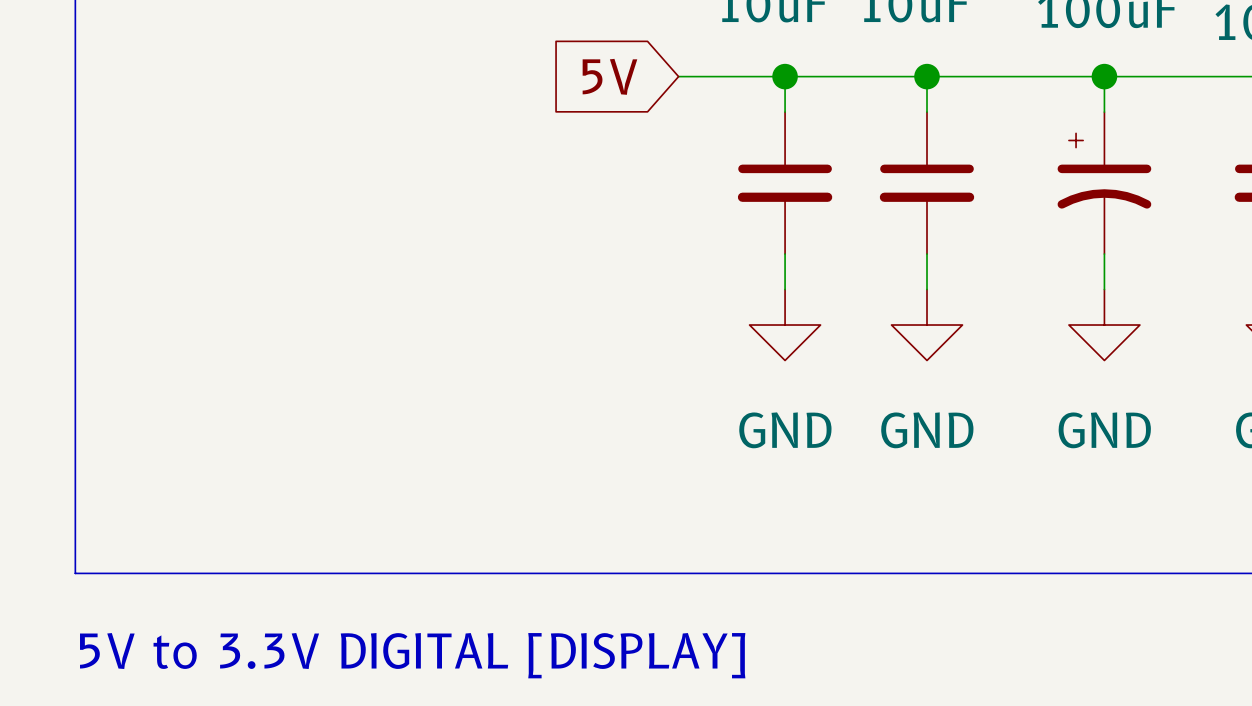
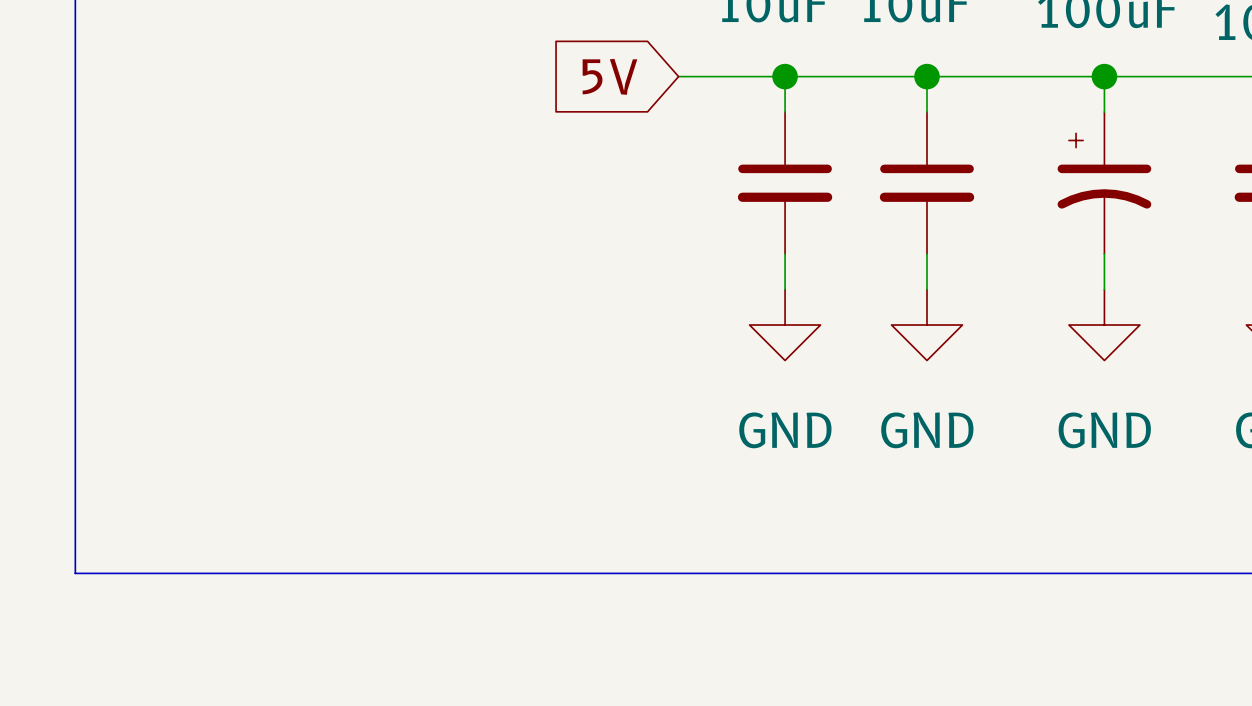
text: 5V to 3.3V DIGITAL [DISPLAY] (412, 655) -> none

